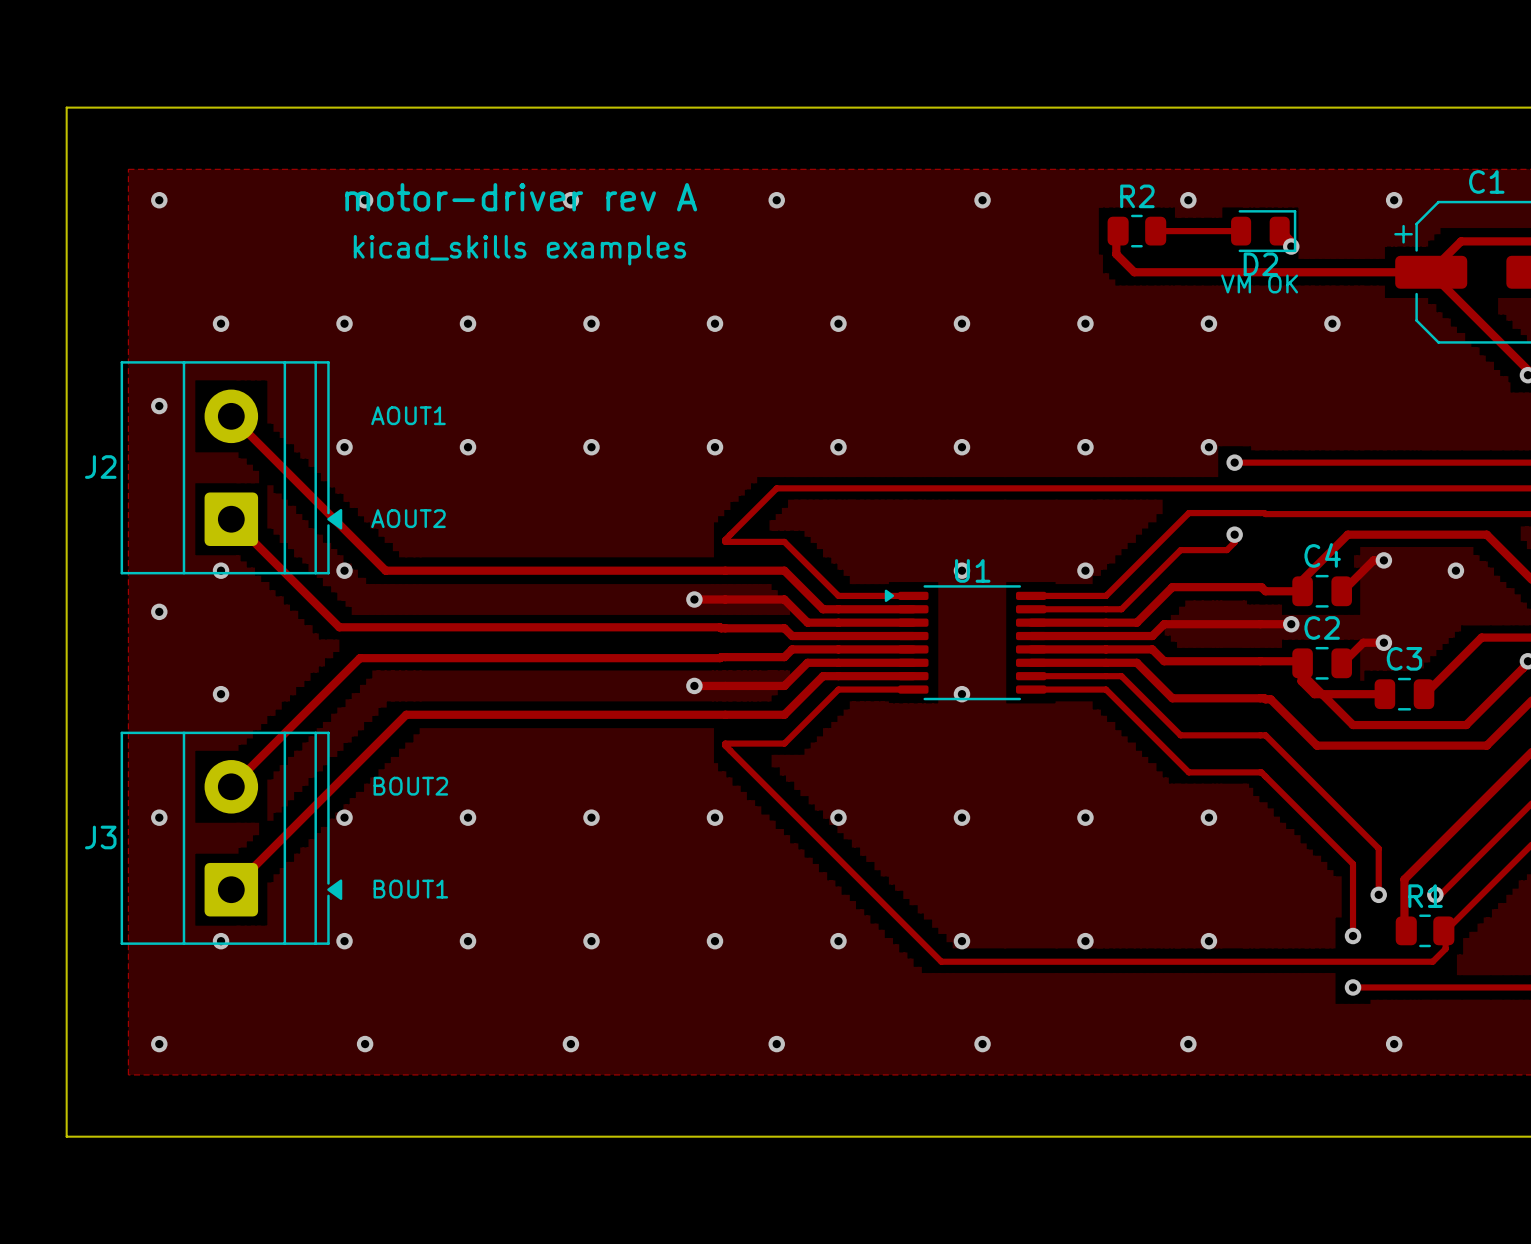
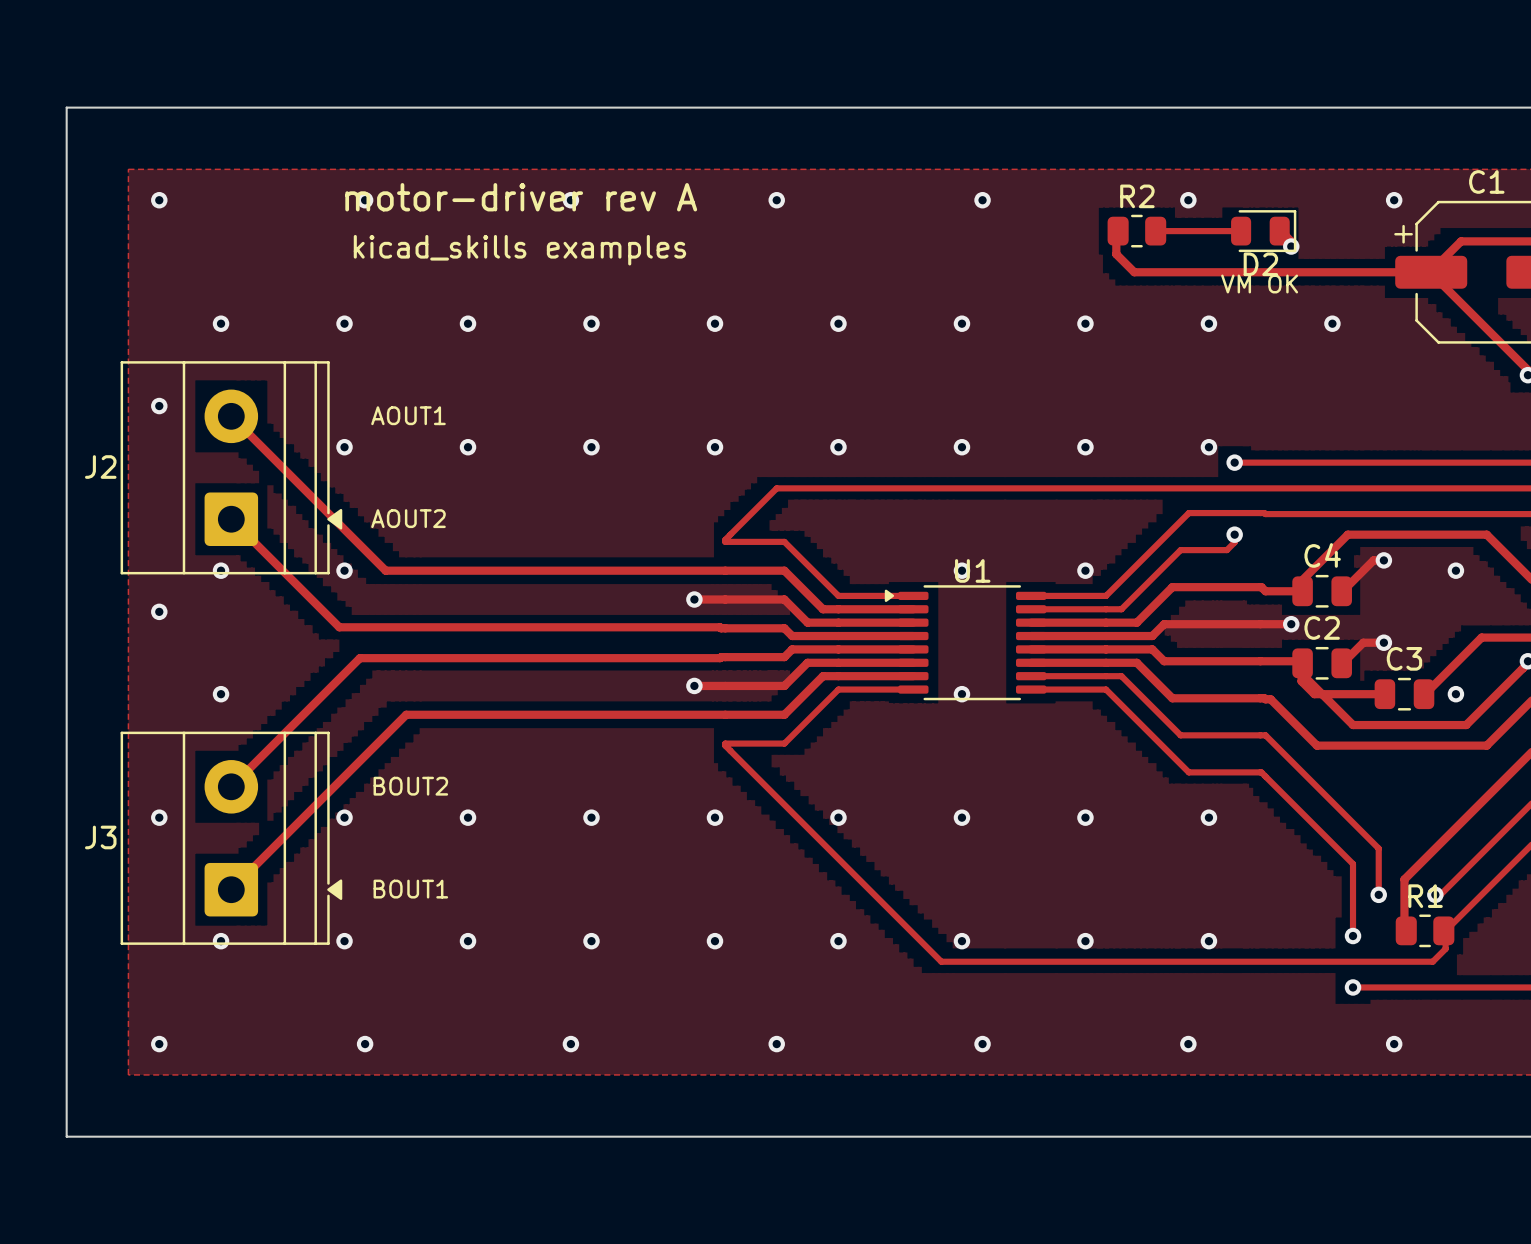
via: none -> (1455, 694)

